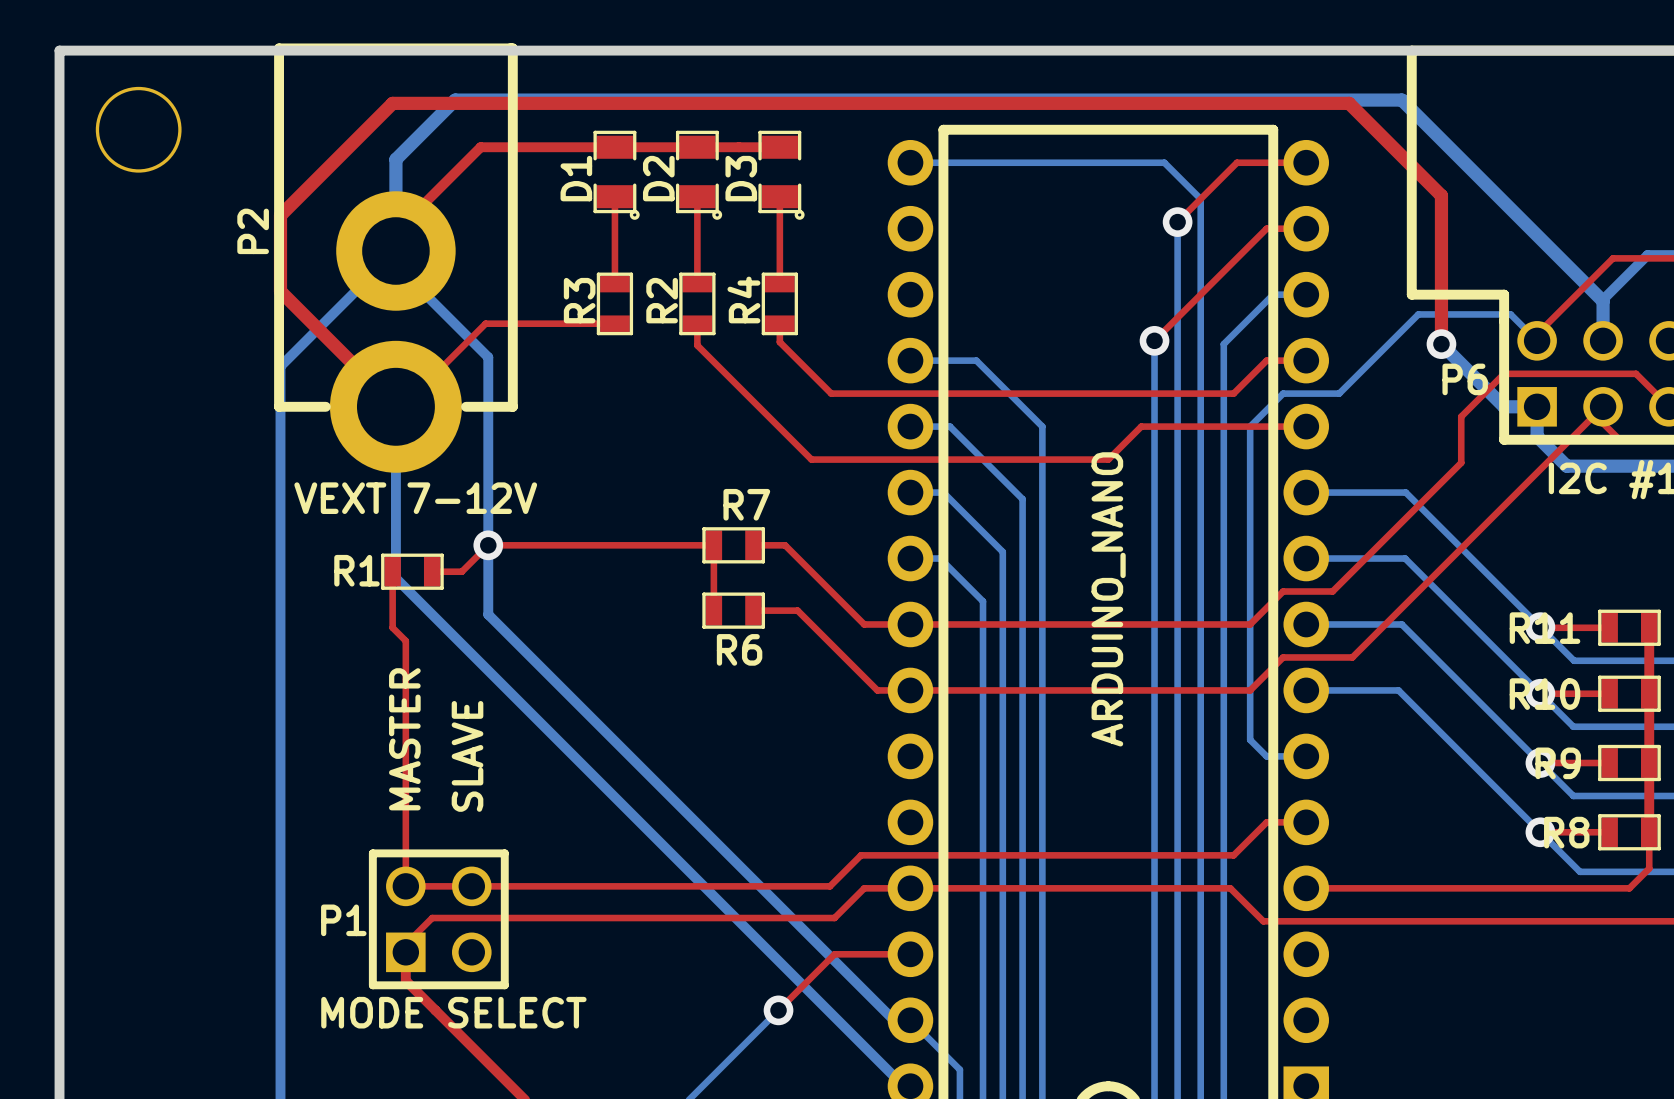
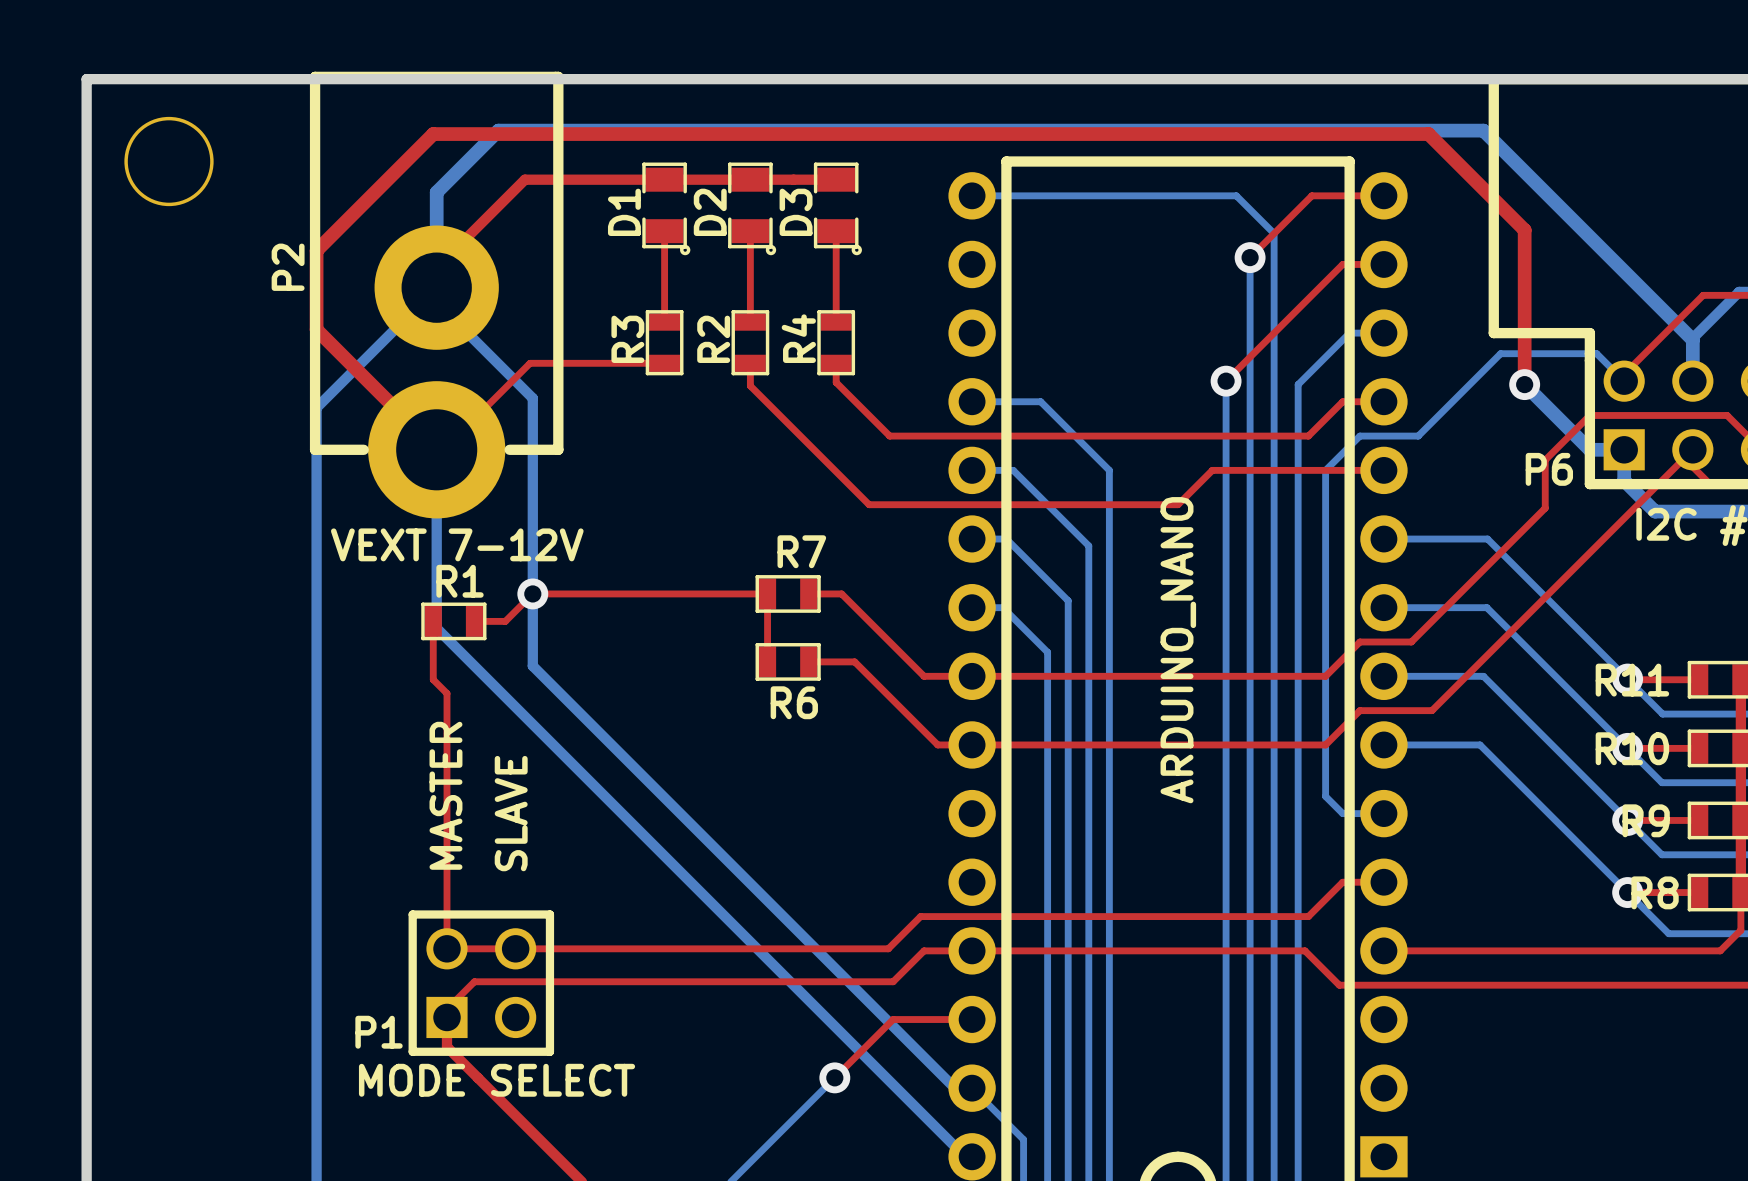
P6 name position: P6 (1465, 379) -> P6 (1549, 469)
R1 name position: R1 (356, 570) -> R1 (460, 581)
P1 name position: P1 (343, 920) -> P1 (379, 1032)

